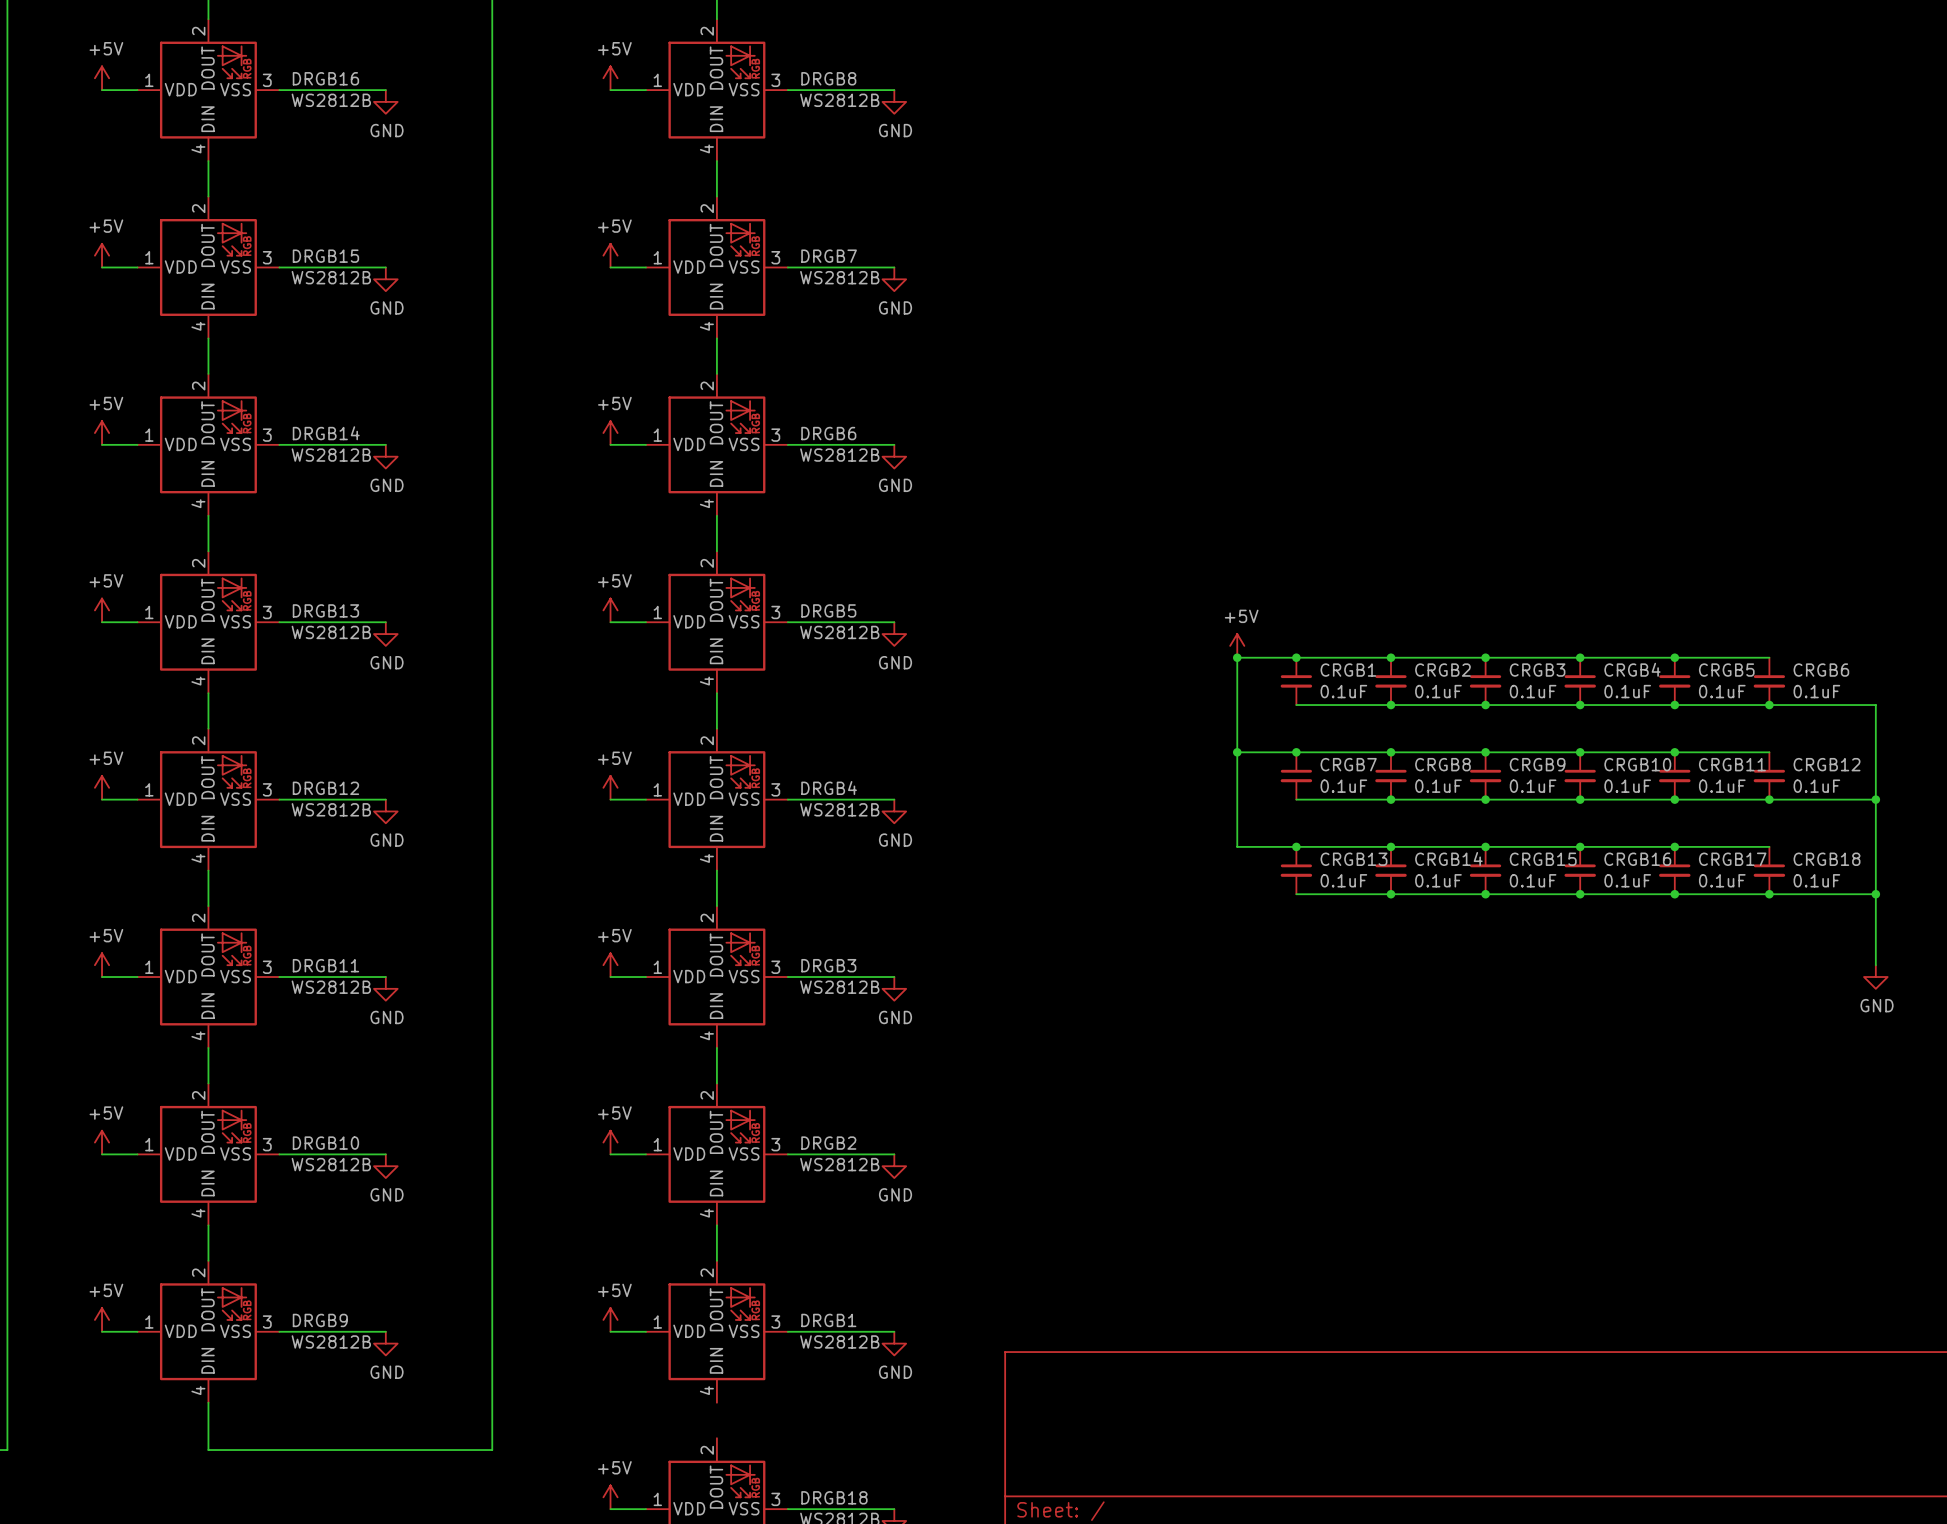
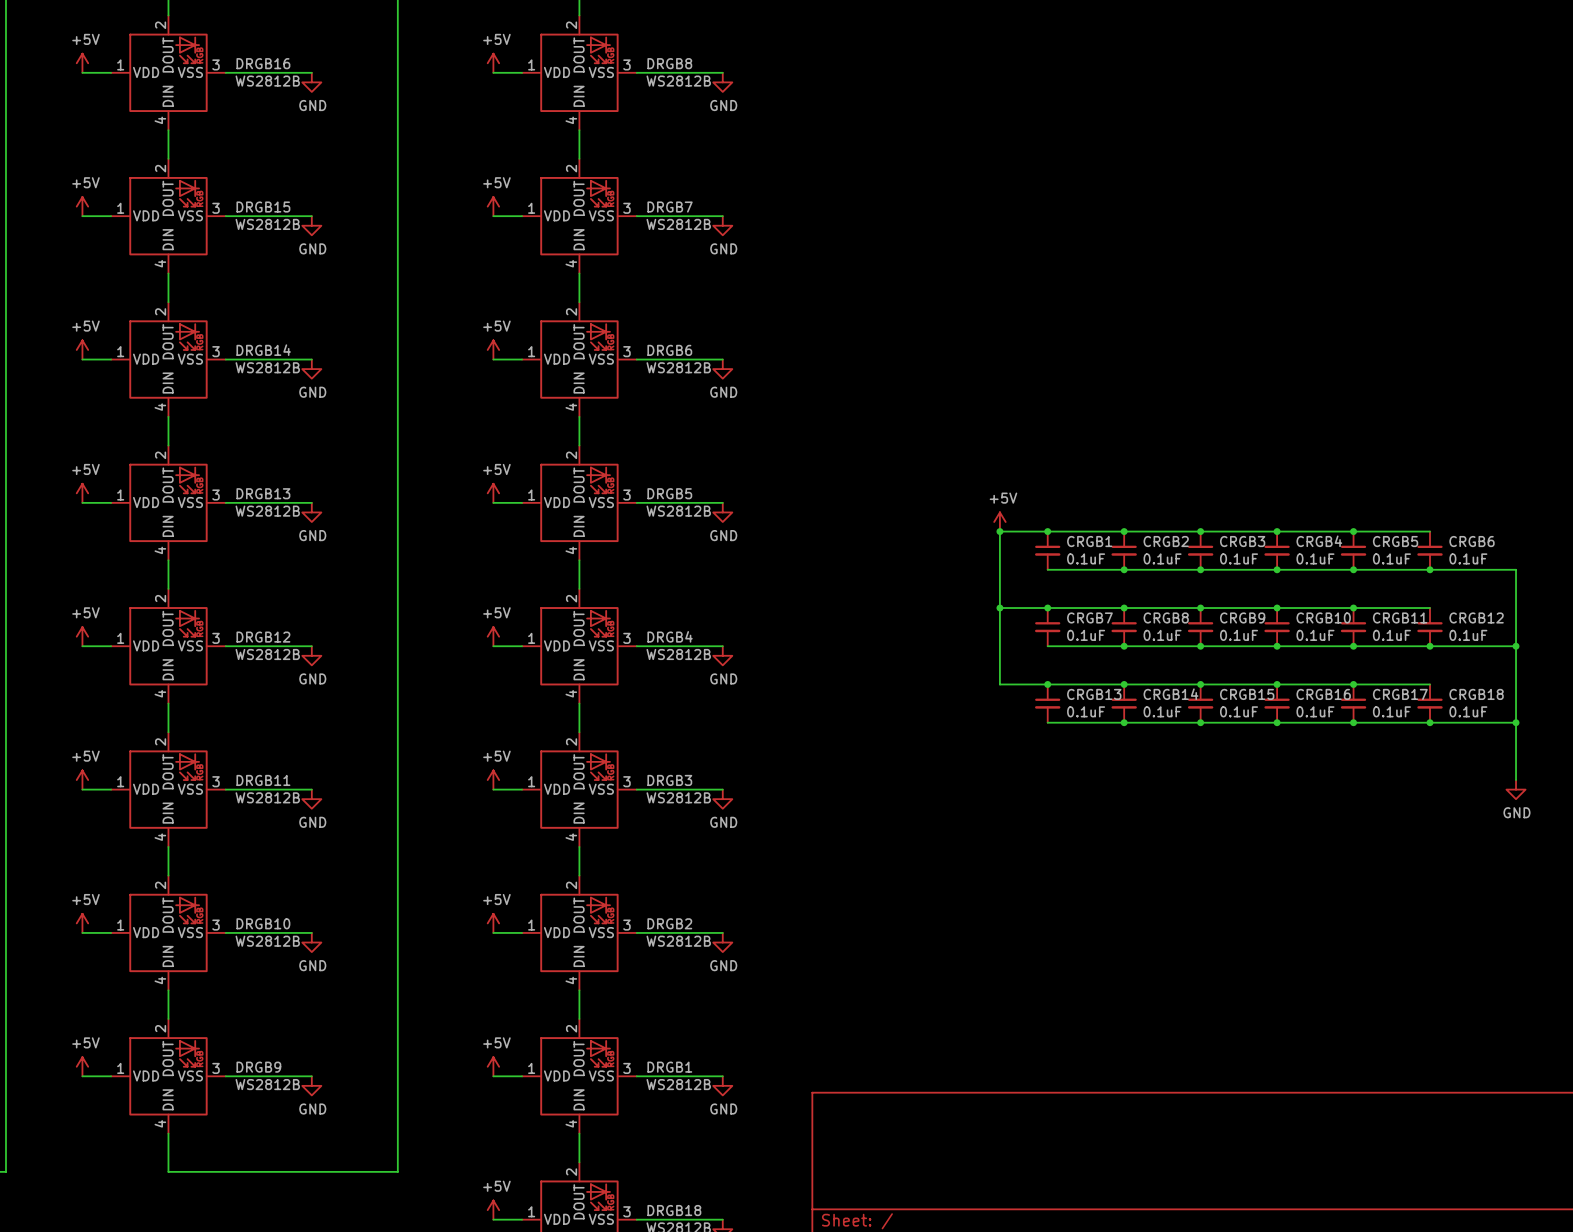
wire: none -> (579, 1133) (579, 1162)

